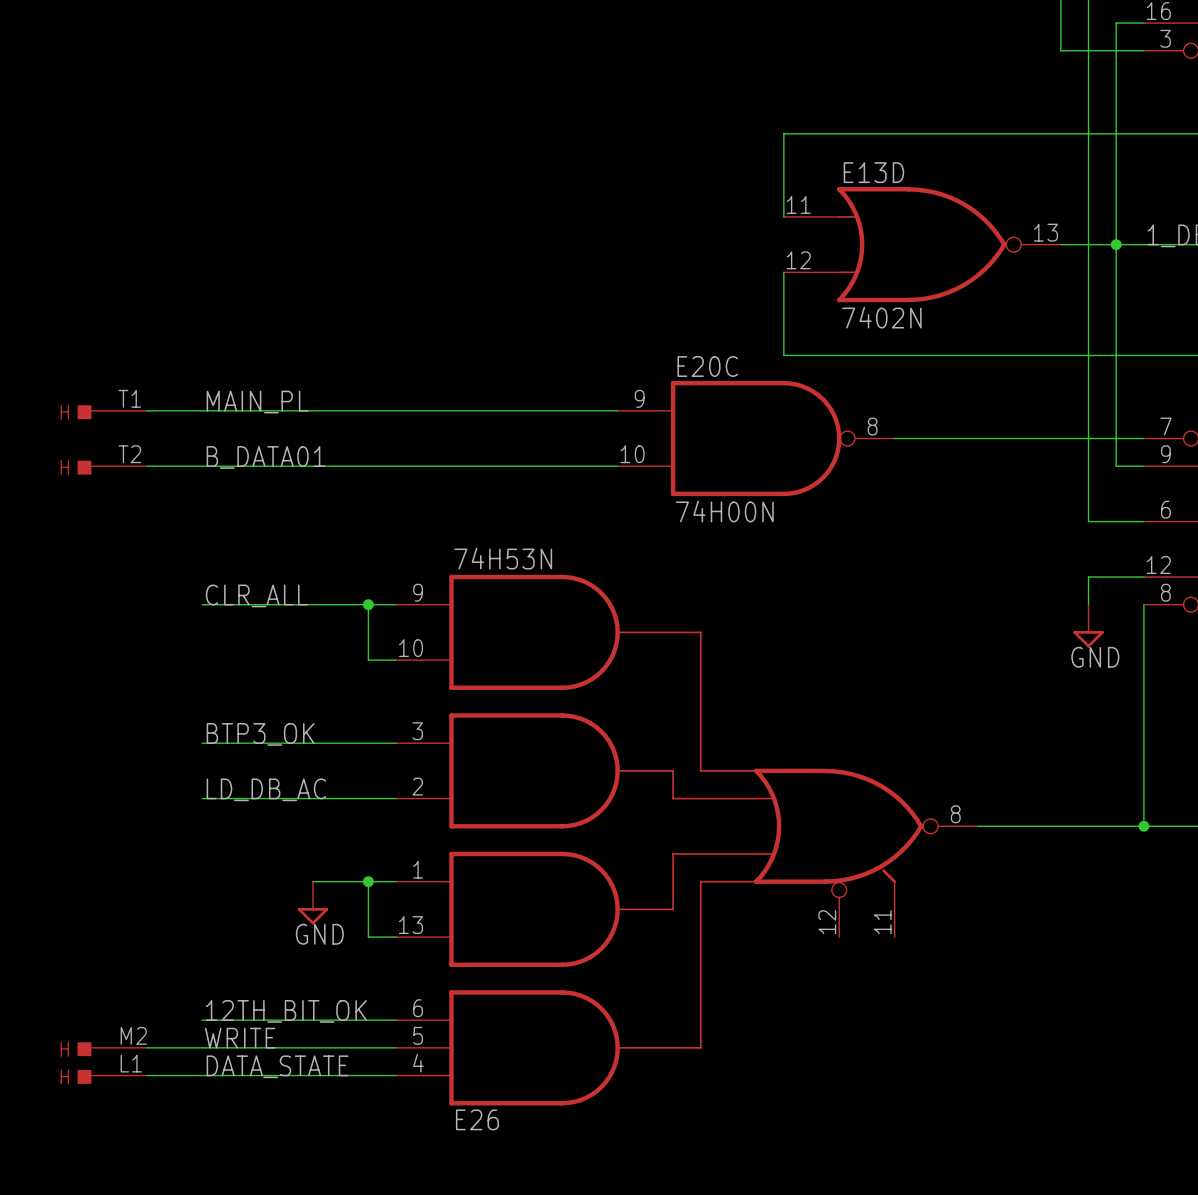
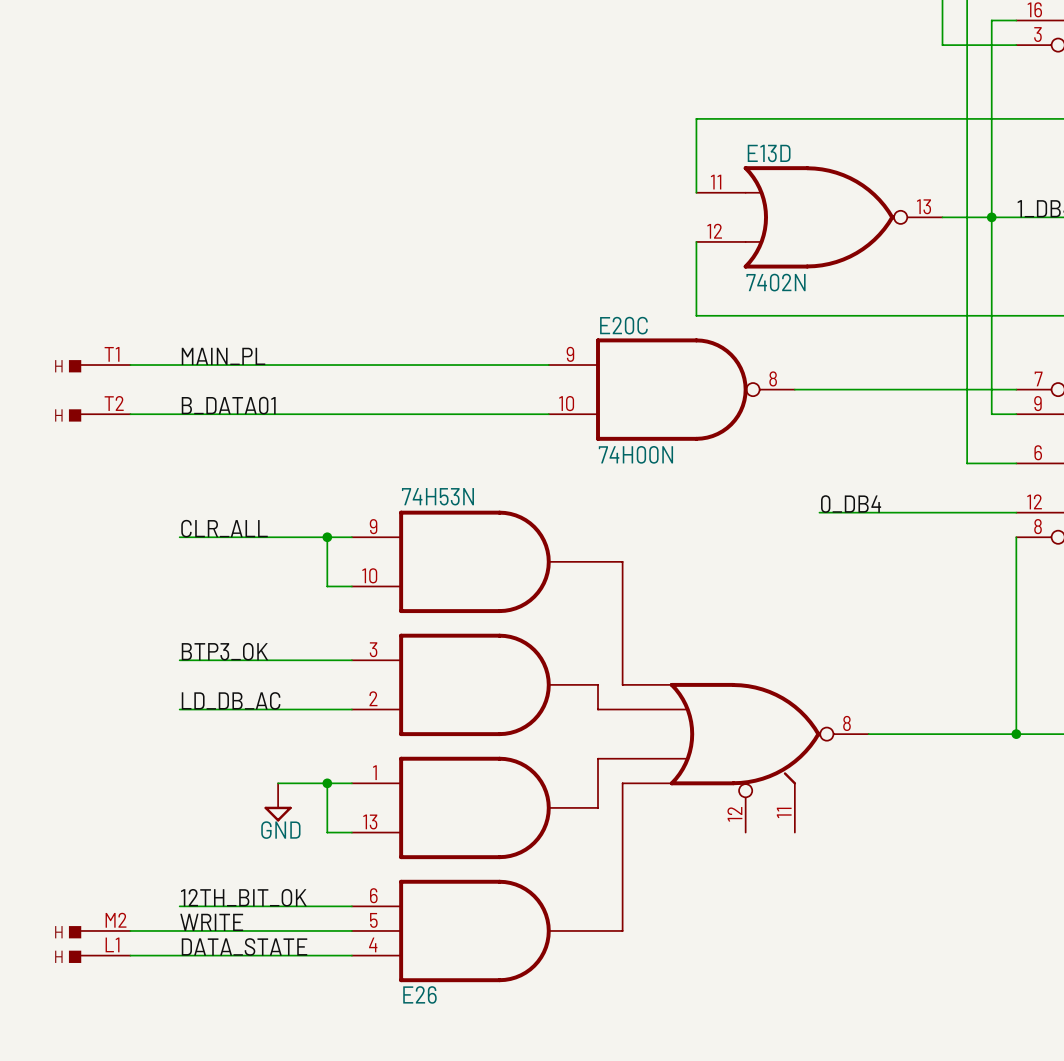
label: none -> 0_DB4 (851, 504)
wire: (1088, 577) (1088, 604) -> (967, 512) (819, 512)
power symbol: GND (1088, 626) -> none

